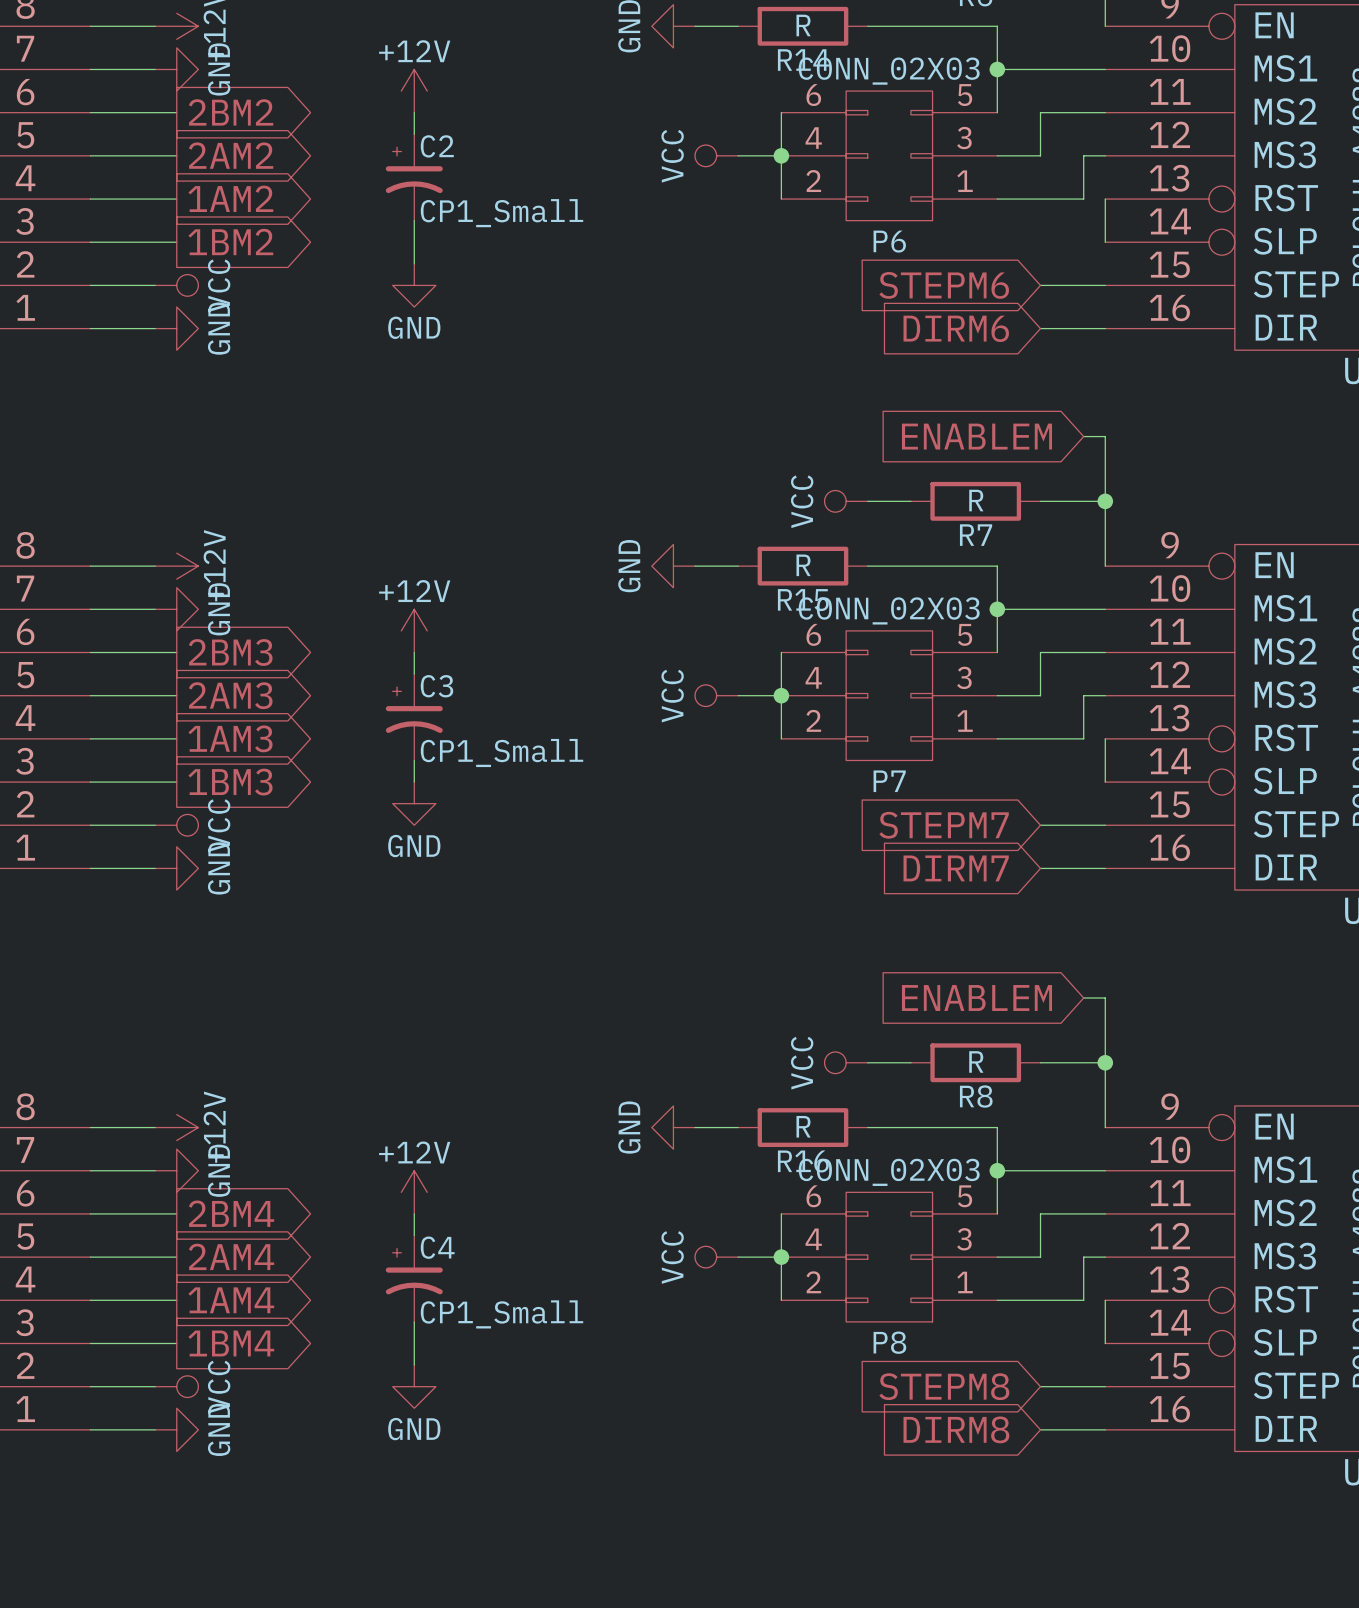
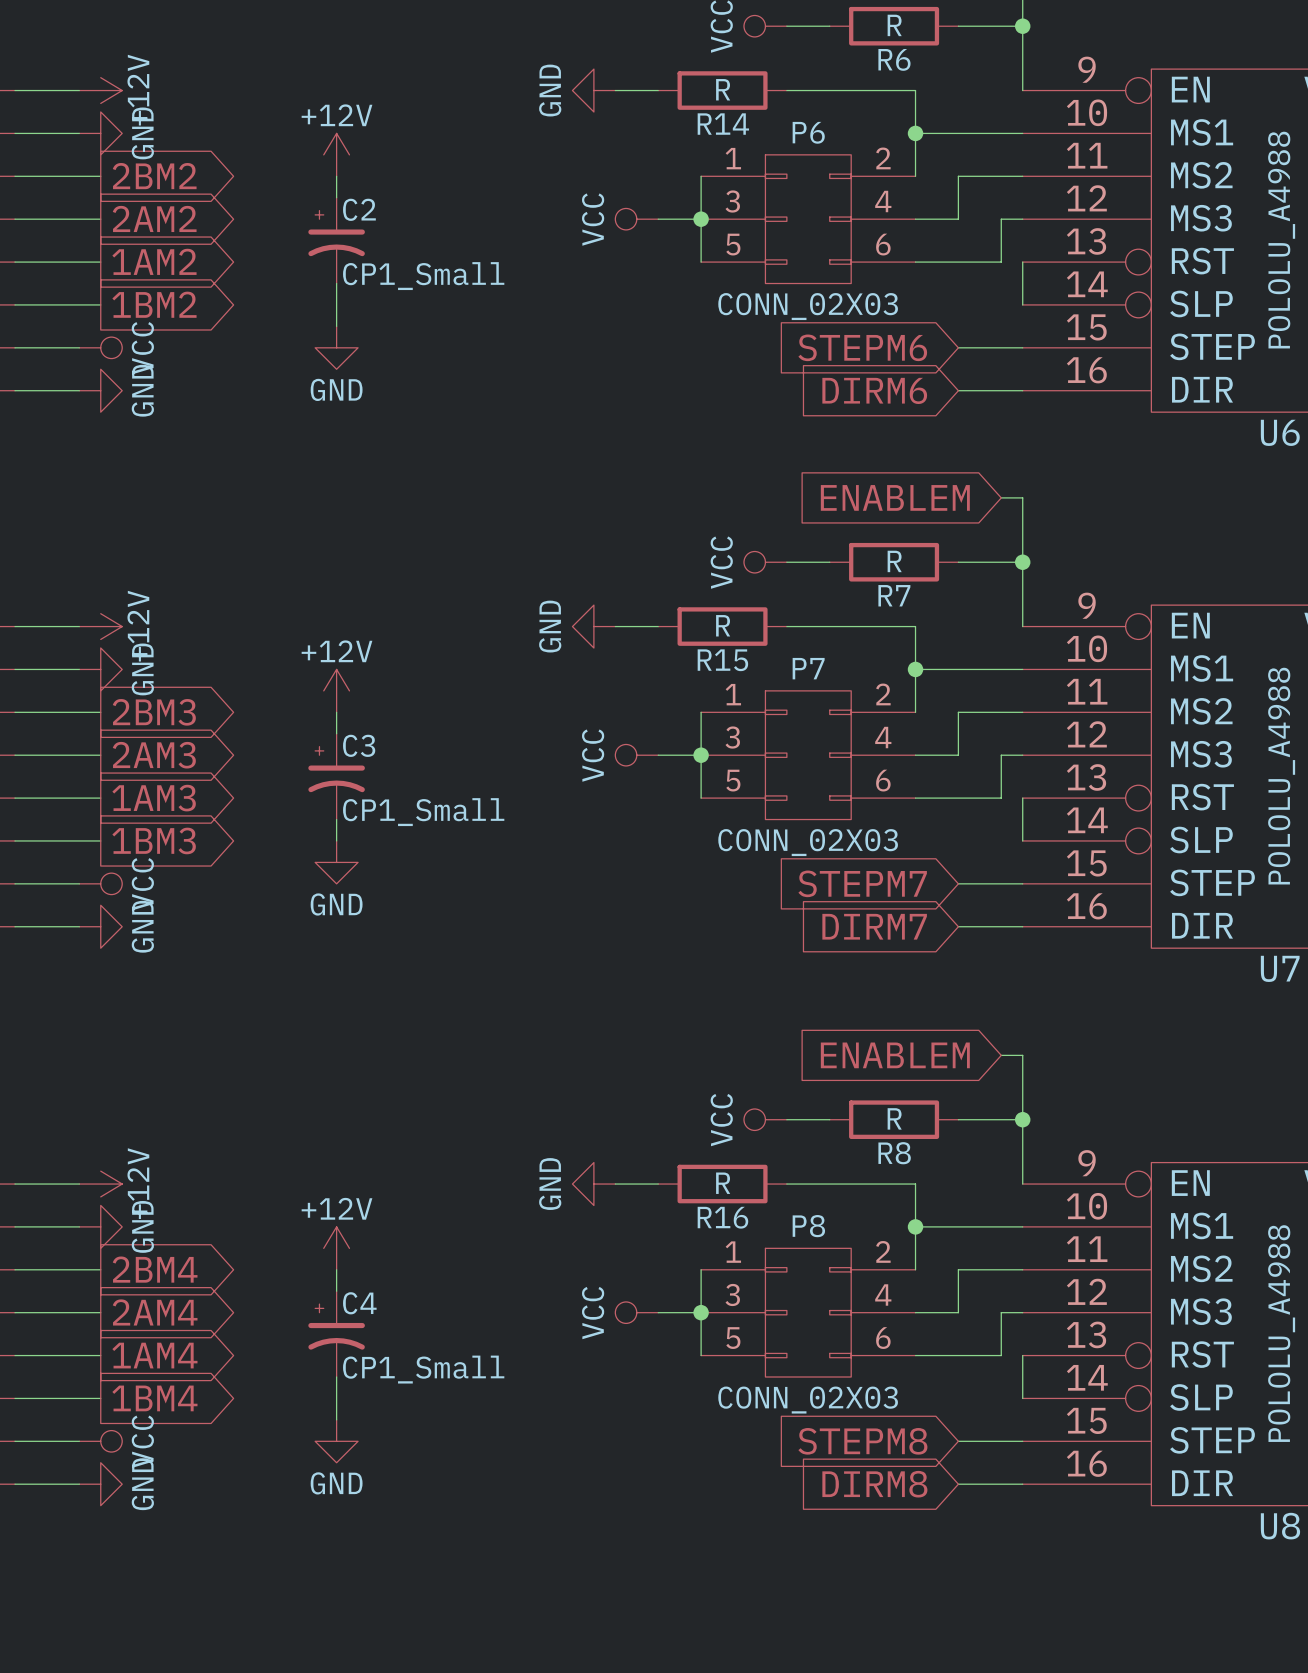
P6 rotation: 0° (889, 155) -> 180° (808, 219)
P7 rotation: 0° (889, 695) -> 180° (808, 755)
P8 rotation: 0° (889, 1257) -> 180° (808, 1312)

